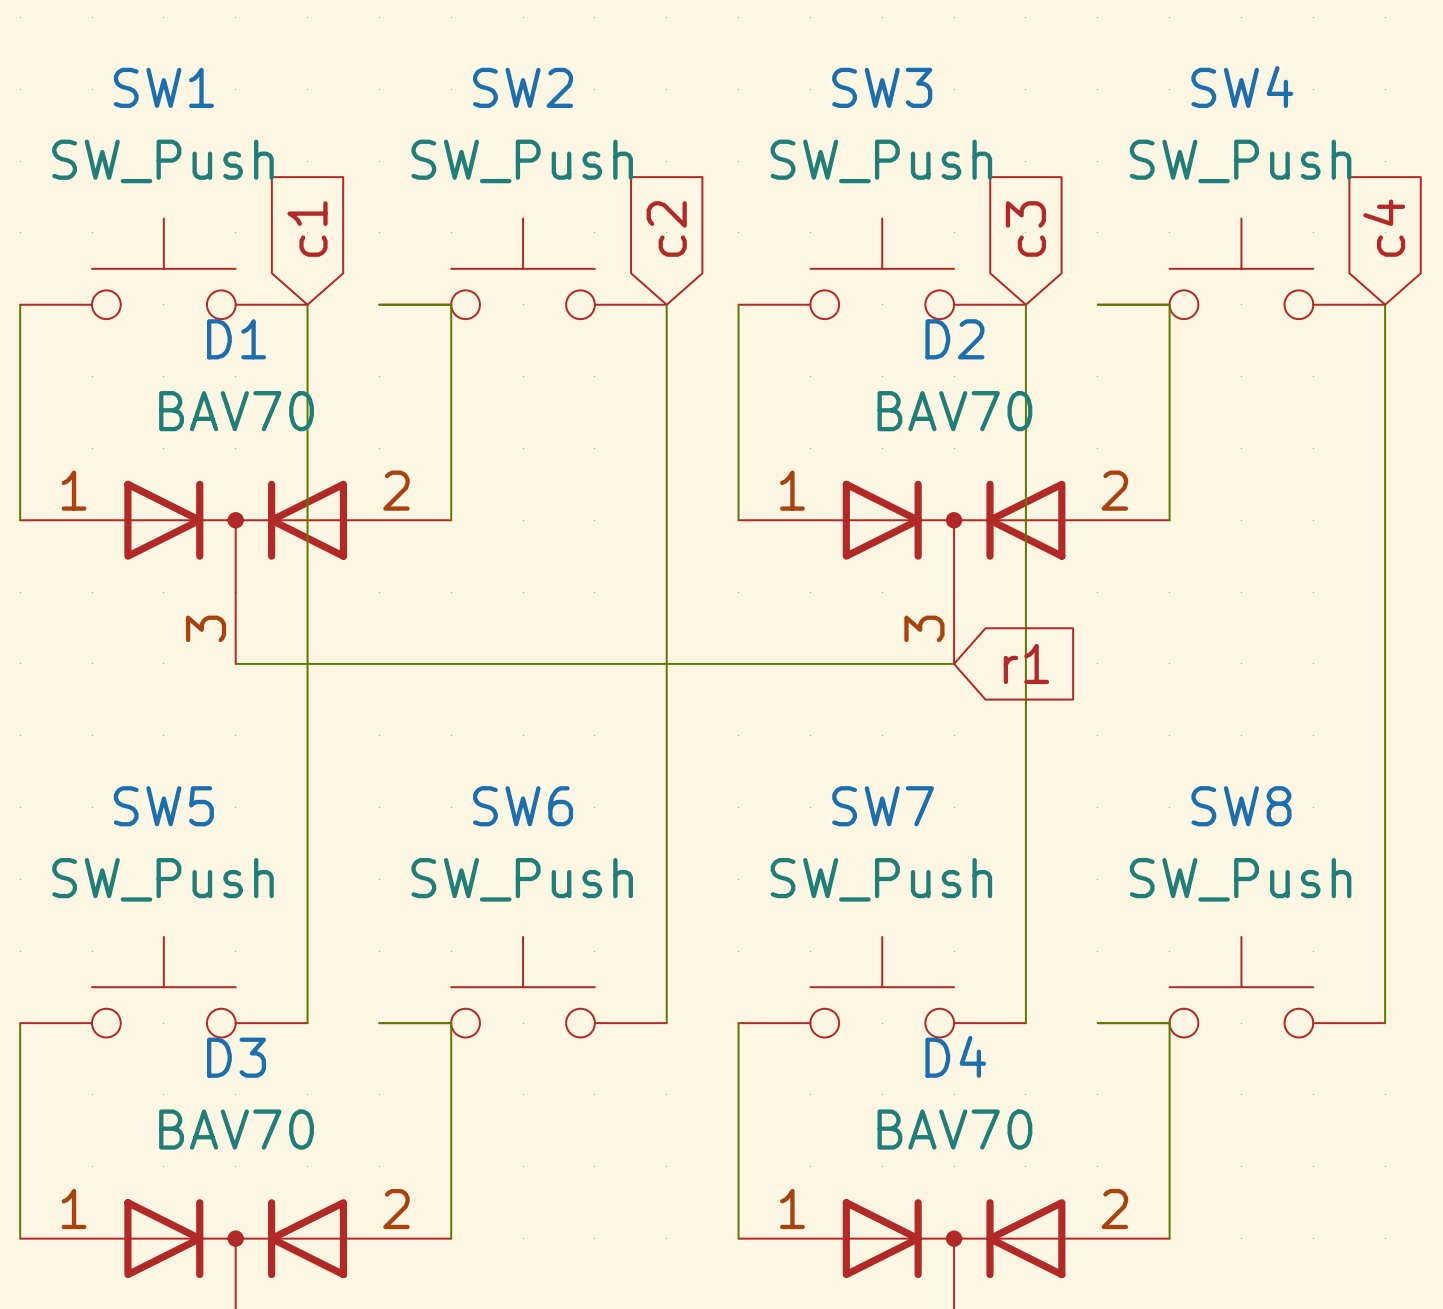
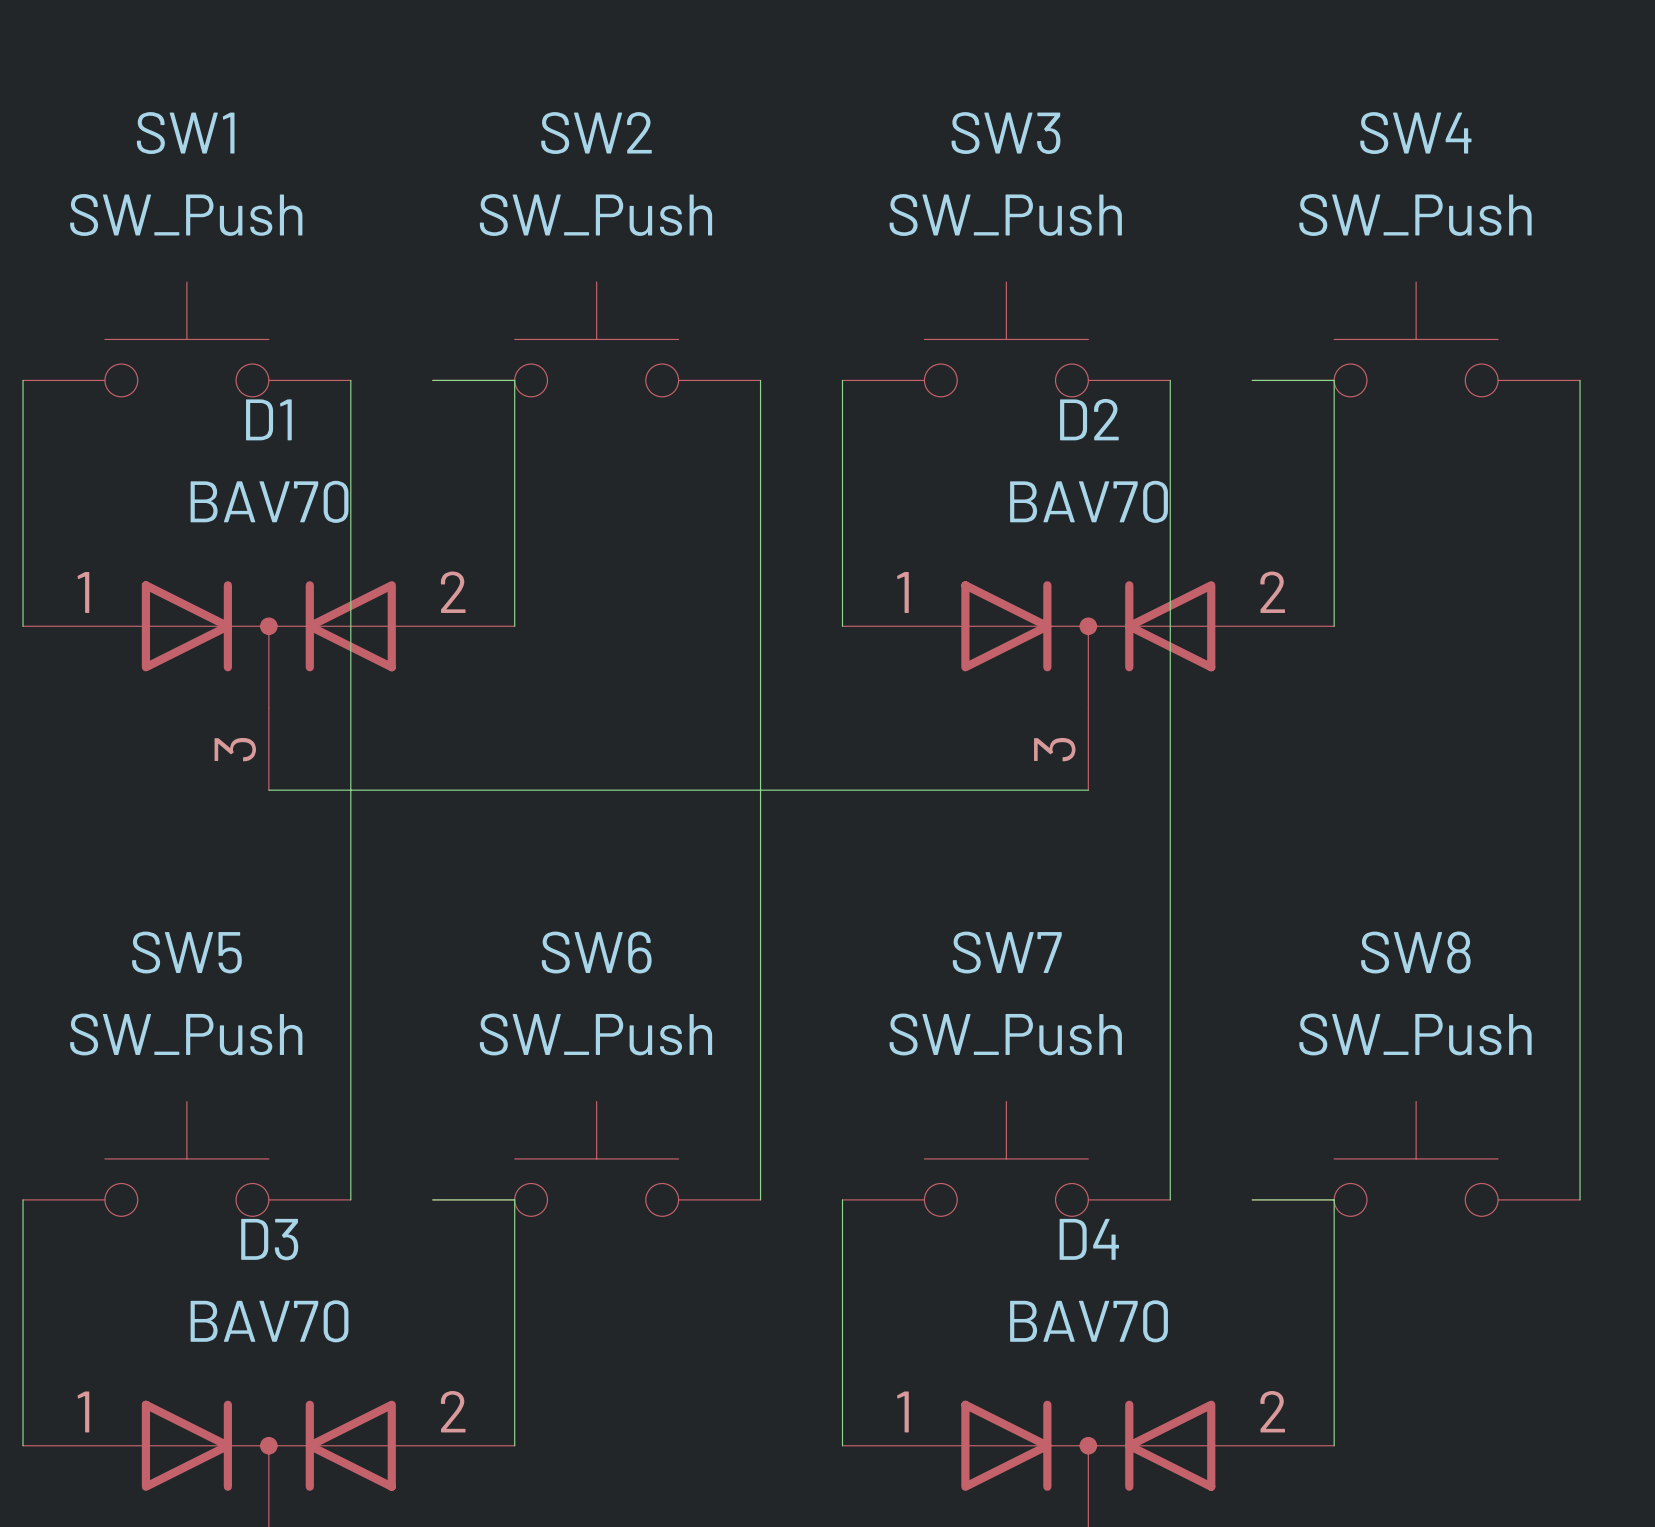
global label: c1 (307, 228) -> none
global label: c2 (666, 228) -> none
global label: c3 (1025, 228) -> none
global label: c4 (1384, 228) -> none
global label: r1 (1026, 663) -> none

